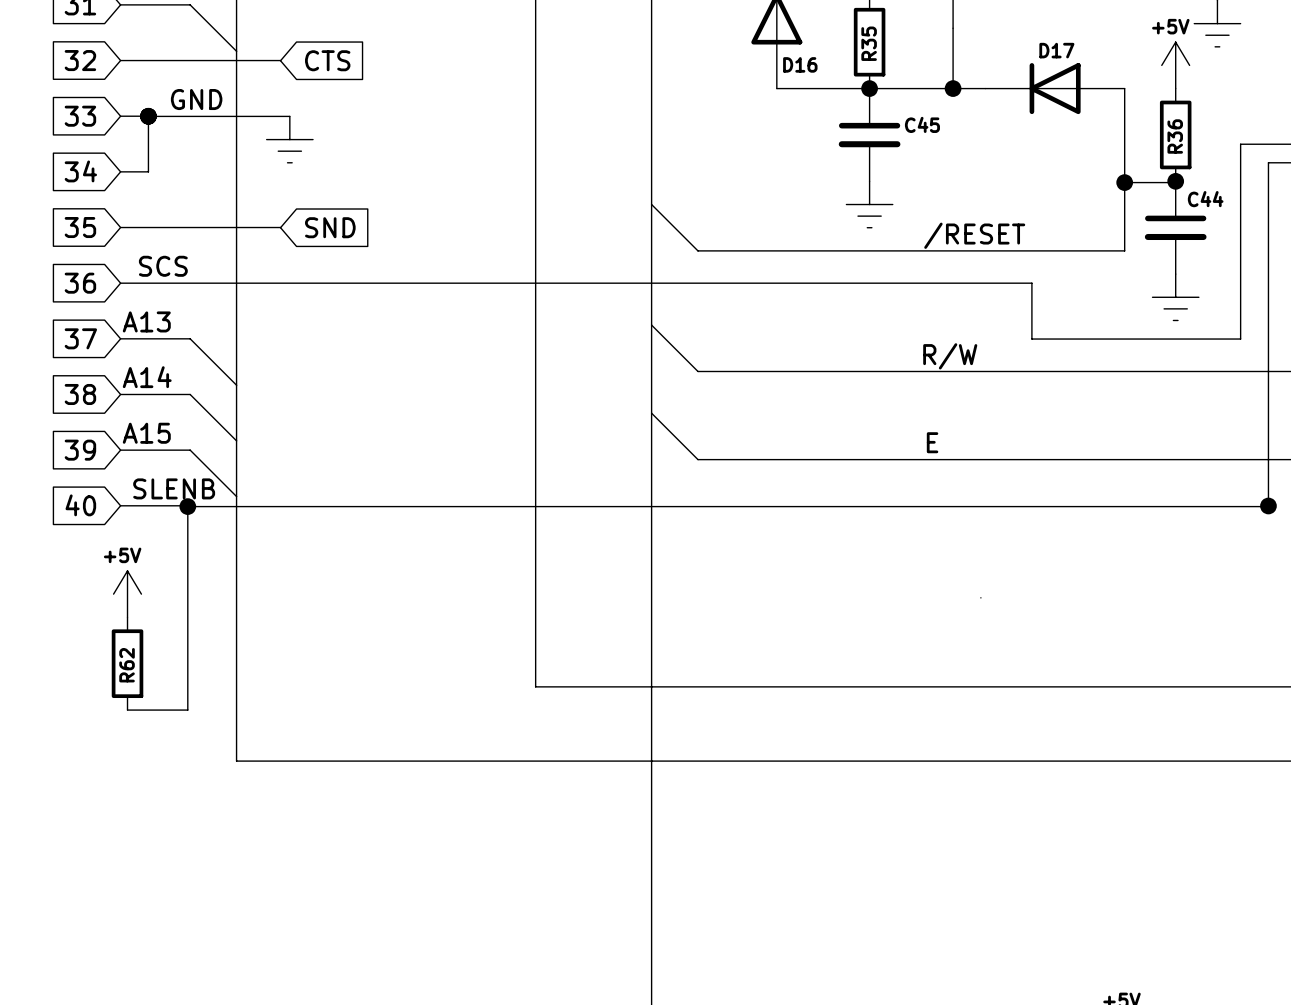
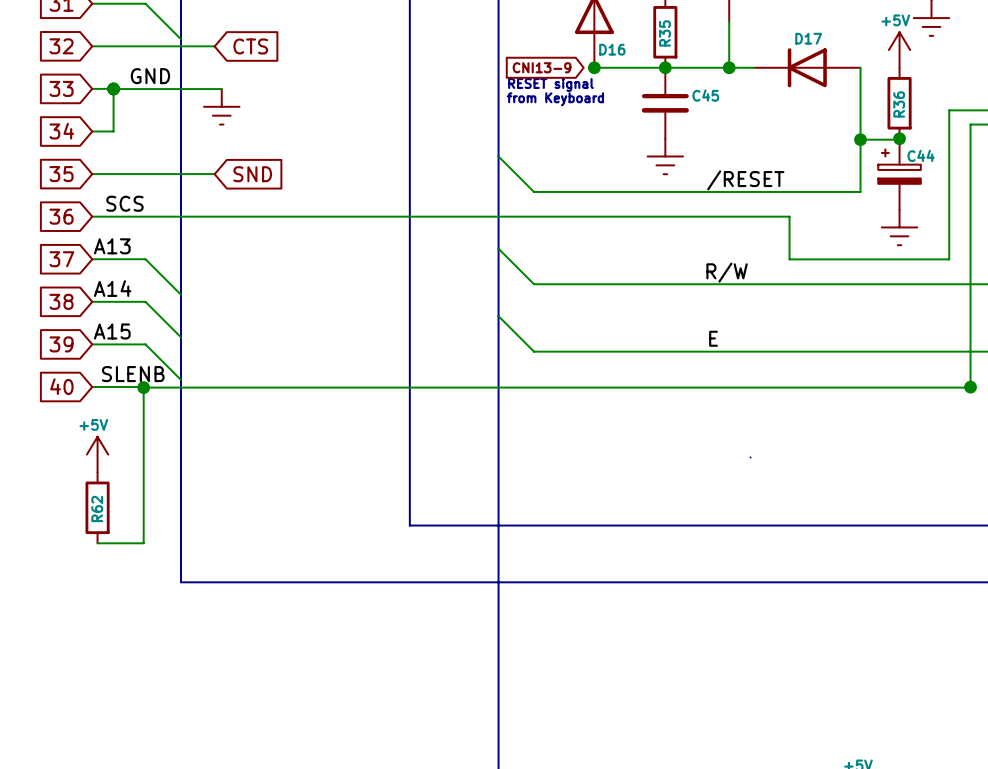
global label: none -> CNI13-9 (542, 67)
junction: none -> (594, 67)
text: none -> RESET signal (550, 84)
text: none -> from Keyboard (555, 99)
part symbol: [1144, 181, 1207, 275] -> [878, 138, 921, 210]

